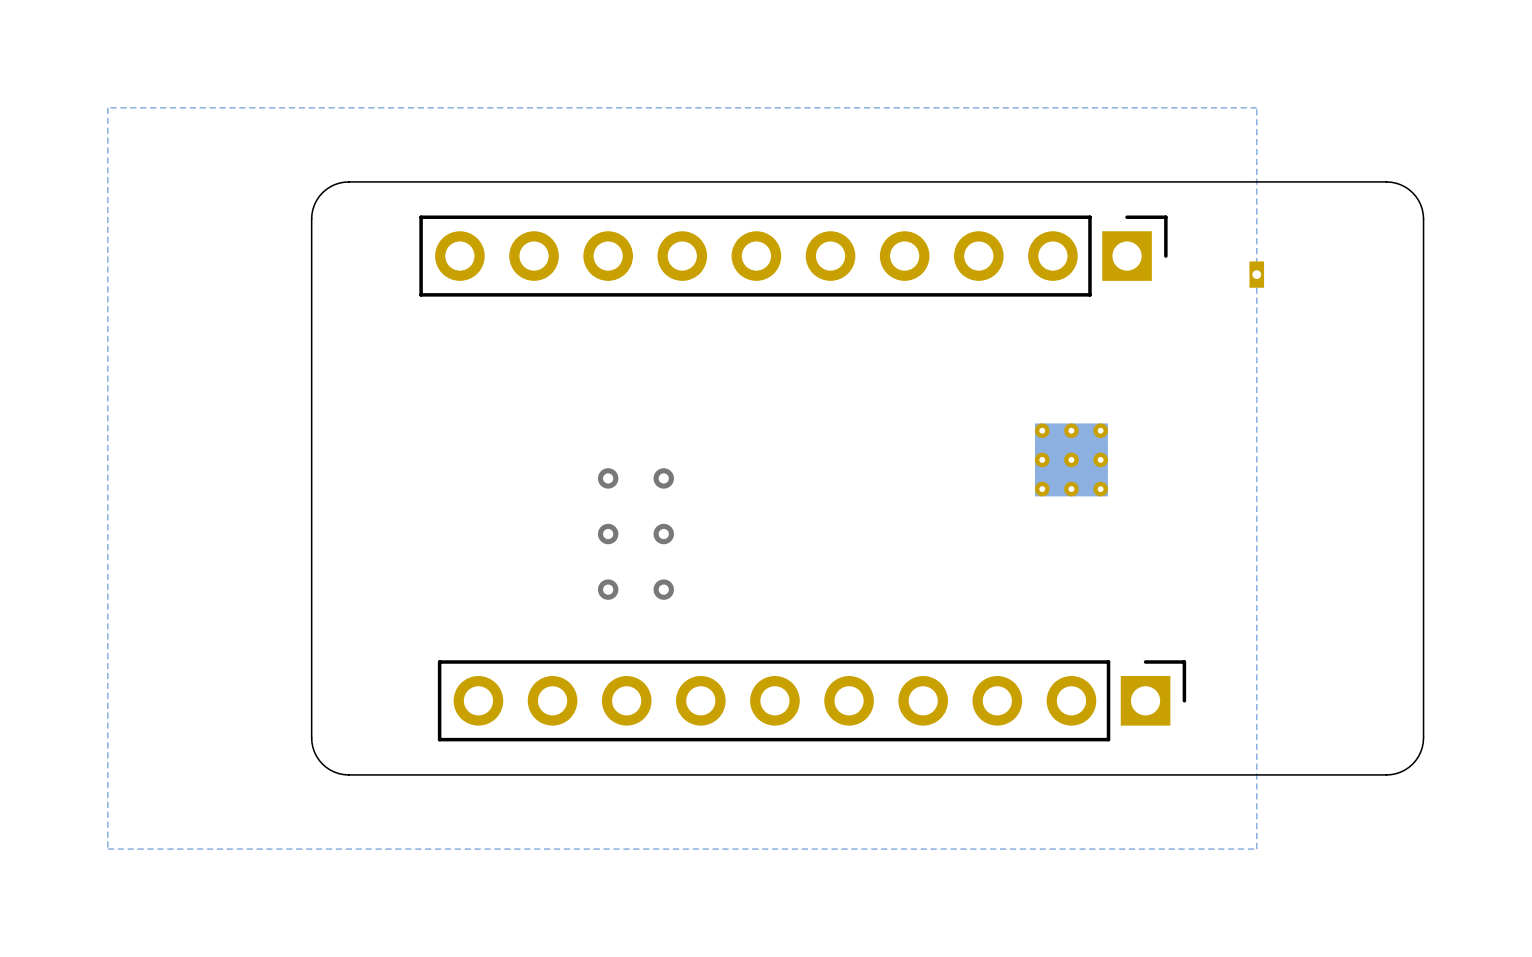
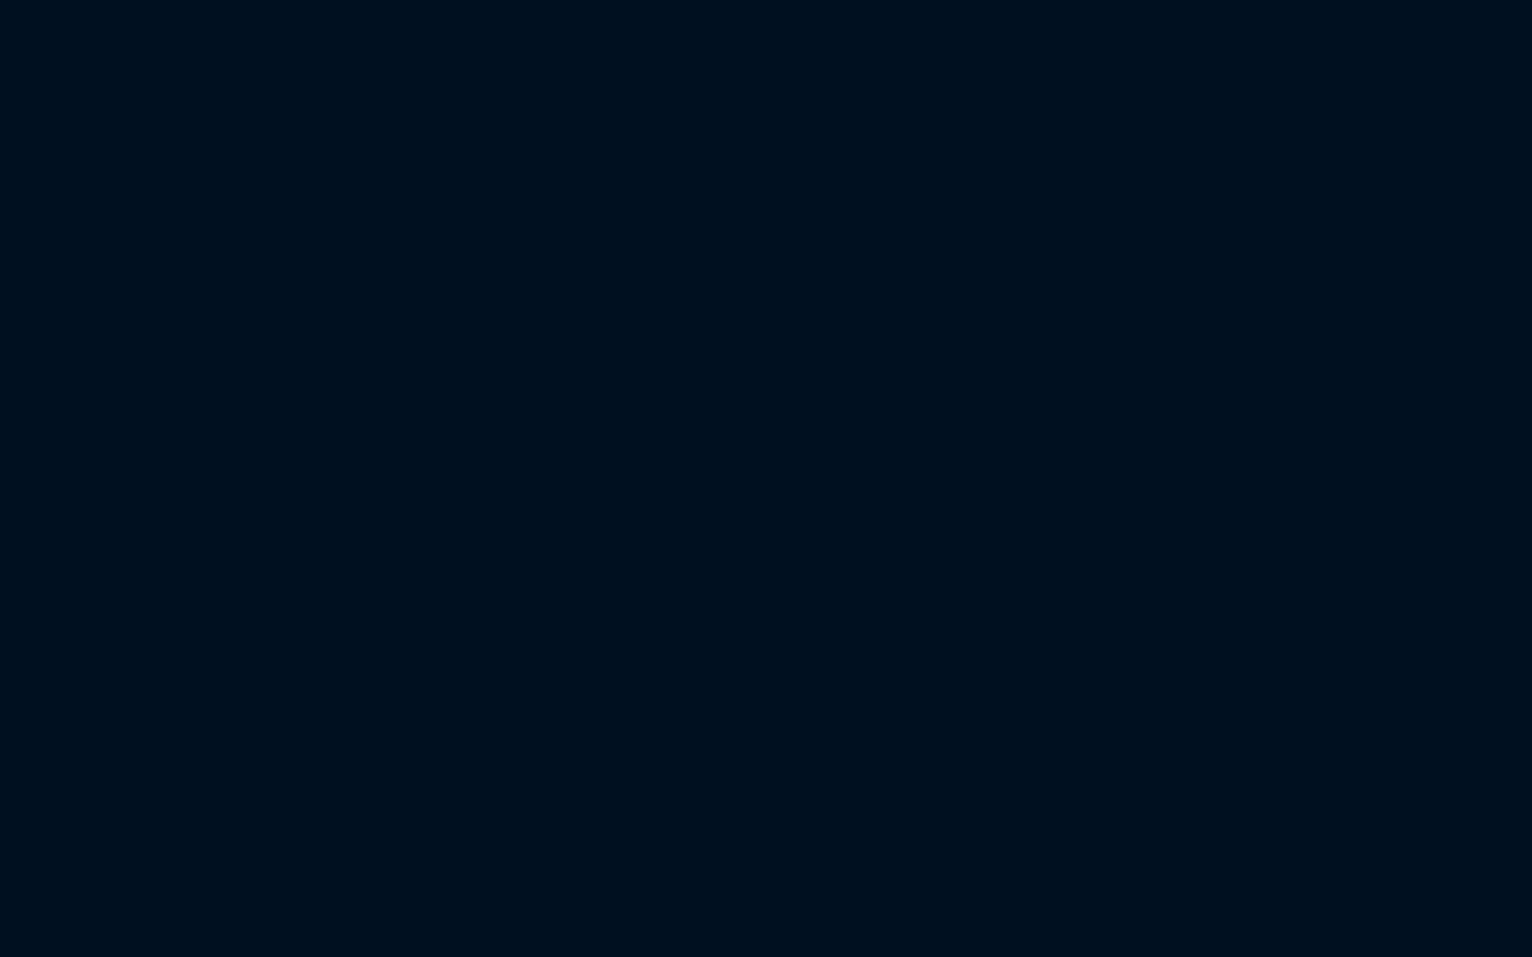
zone outline: (1256, 107) (1256, 849) (107, 849) (107, 107) (1256, 107) -> none
board edge: (1386, 181) (348, 181) (330, 186) (316, 200) (311, 218) (311, 737) (316, 756) (330, 769) (348, 774) (1386, 774) (1405, 769) (1418, 756) (1423, 737) (1423, 218) (1420, 204) (1412, 192) (1400, 184) (1386, 181) -> none
part: (793, 256) -> none
part: (1256, 274) -> none
part: (1071, 459) -> none
via: (608, 478) -> none
via: (663, 478) -> none
via: (608, 534) -> none
via: (663, 534) -> none
via: (608, 589) -> none
via: (663, 589) -> none
part: (812, 700) -> none

